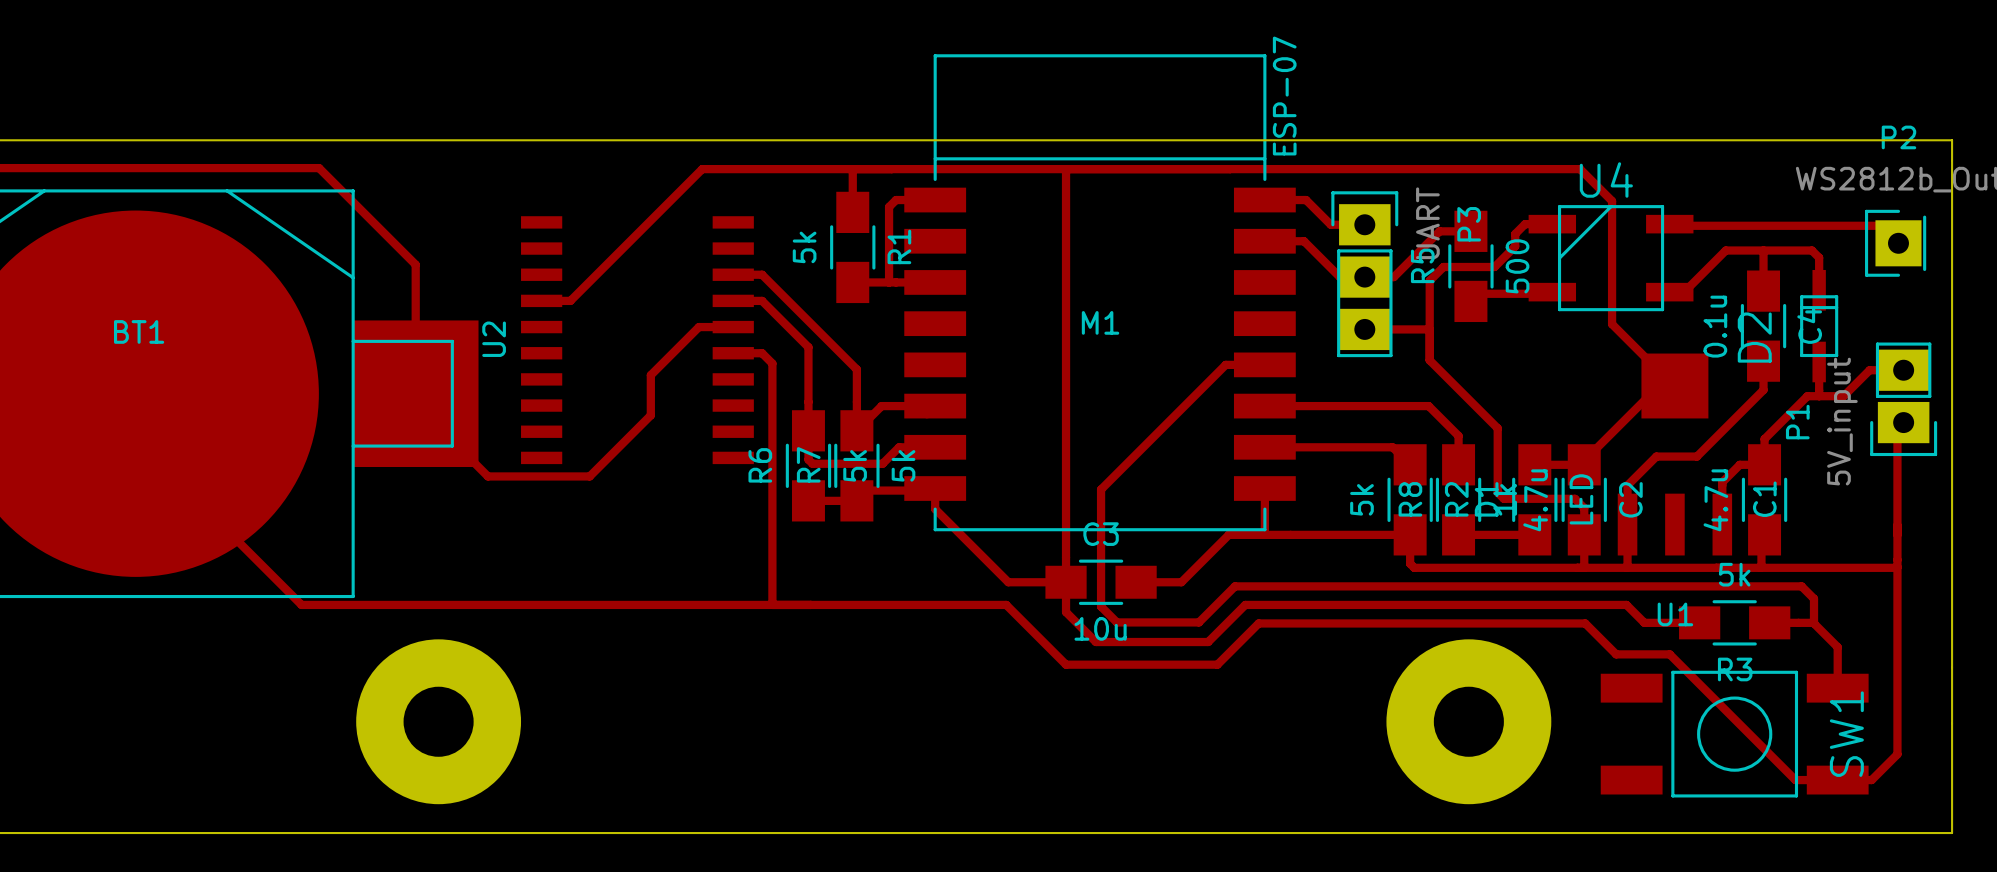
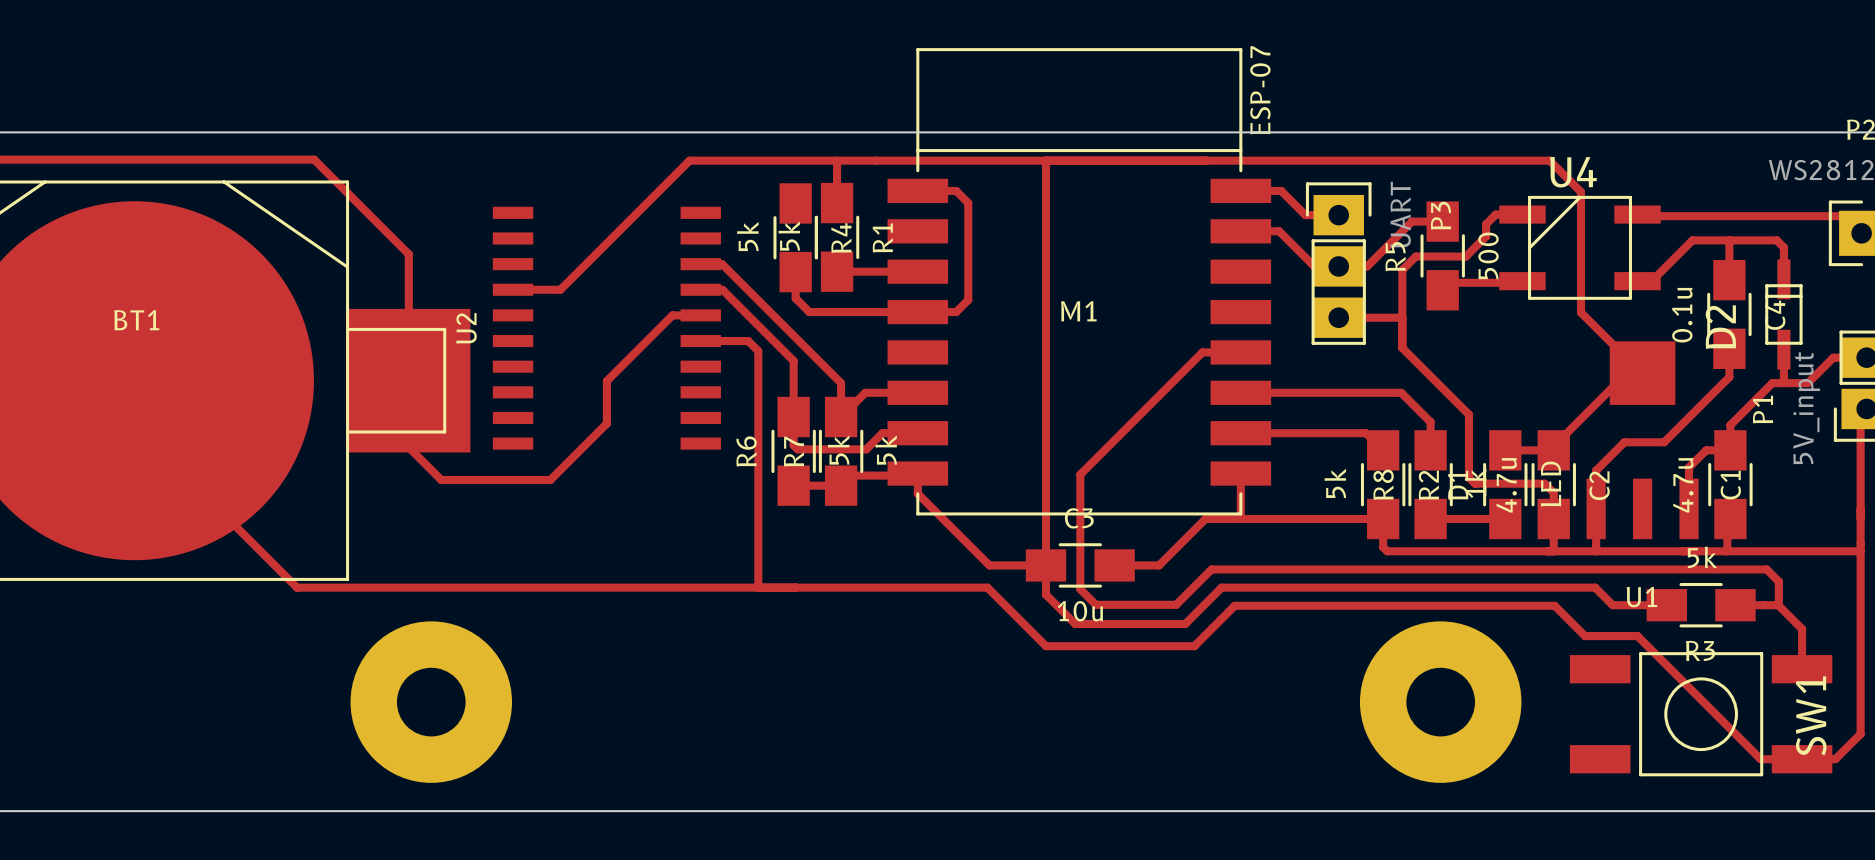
top track: (935, 200) (896, 200) (889, 207) (889, 282) -> (917, 190) (956, 190) (968, 203) (968, 299) (956, 312) (809, 312) (795, 298) (795, 272)
R4: none -> 5k (795, 237)
top track: (735, 274) (762, 274) (856, 369) (856, 396) -> (722, 264) (841, 383)
top track: (735, 300) (762, 300) (808, 347) (808, 373) -> (722, 289) (793, 360)
top track: (698, 327) (650, 375) (650, 415) (589, 476) (487, 476) (415, 404) -> (686, 315) (672, 315) (606, 381) (606, 423) (550, 480) (441, 480) (408, 447) (408, 390)
U2 position: (637, 340) -> (606, 328)

